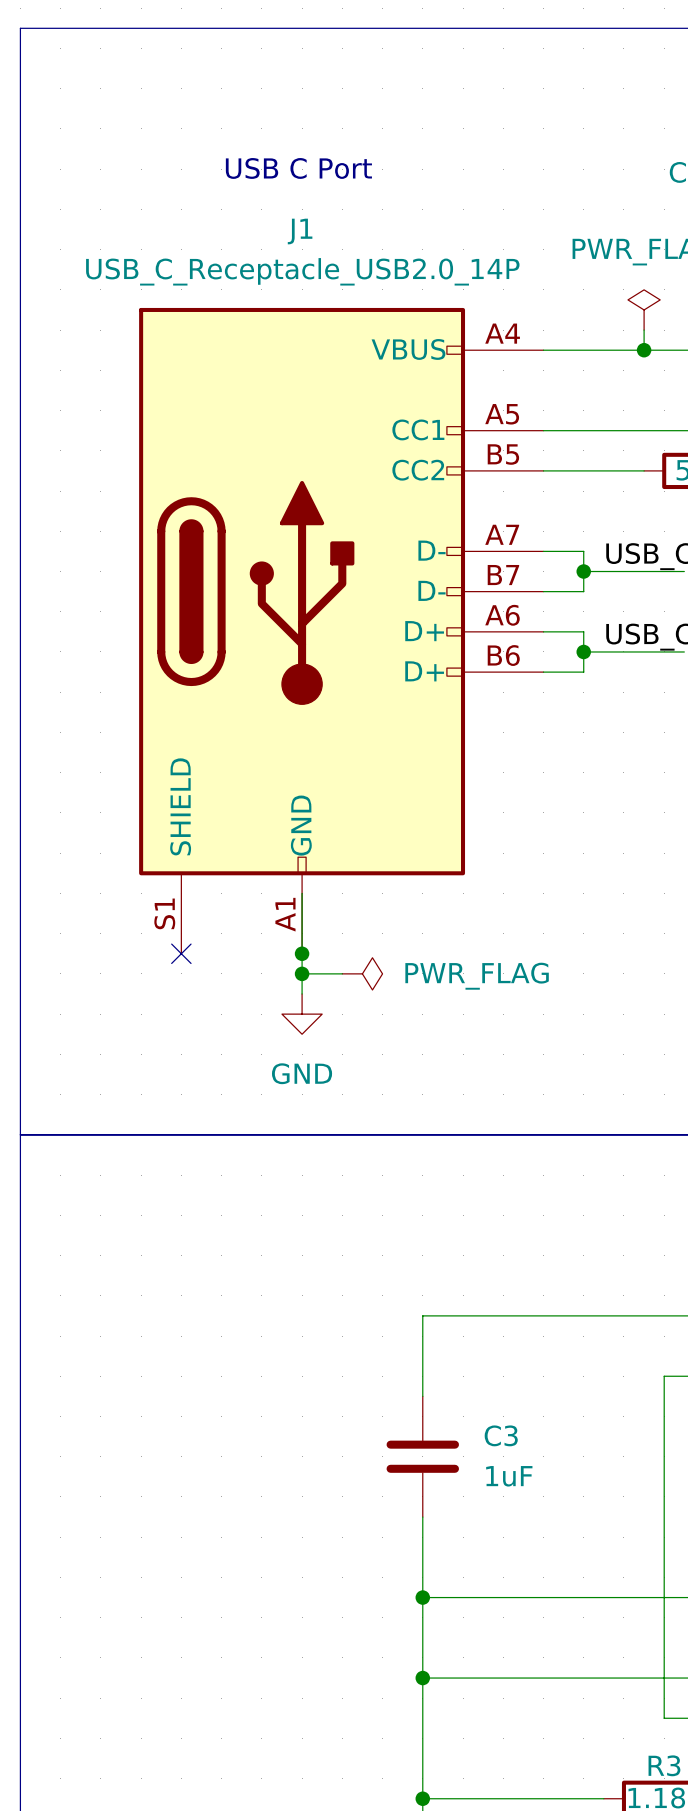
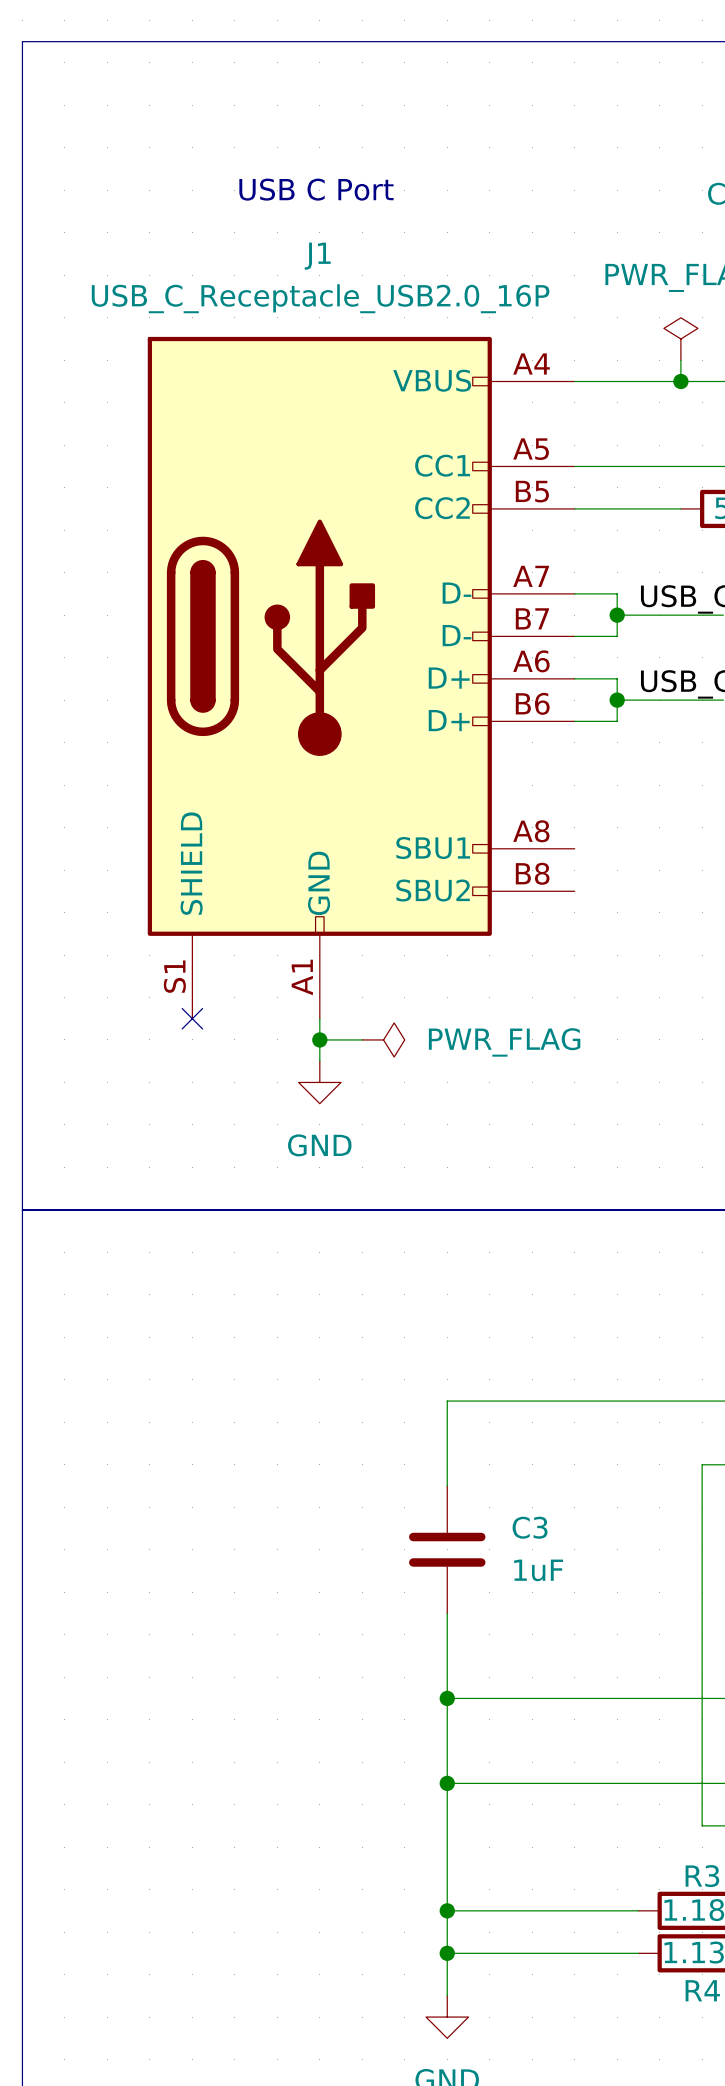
J1 value: USB_C_Receptacle_USB2.0_14P (302, 271) -> USB_C_Receptacle_USB2.0_16P (320, 298)
J1 symbol: [139, 307, 544, 954] -> [147, 336, 575, 1019]
junction: (302, 953) -> none

